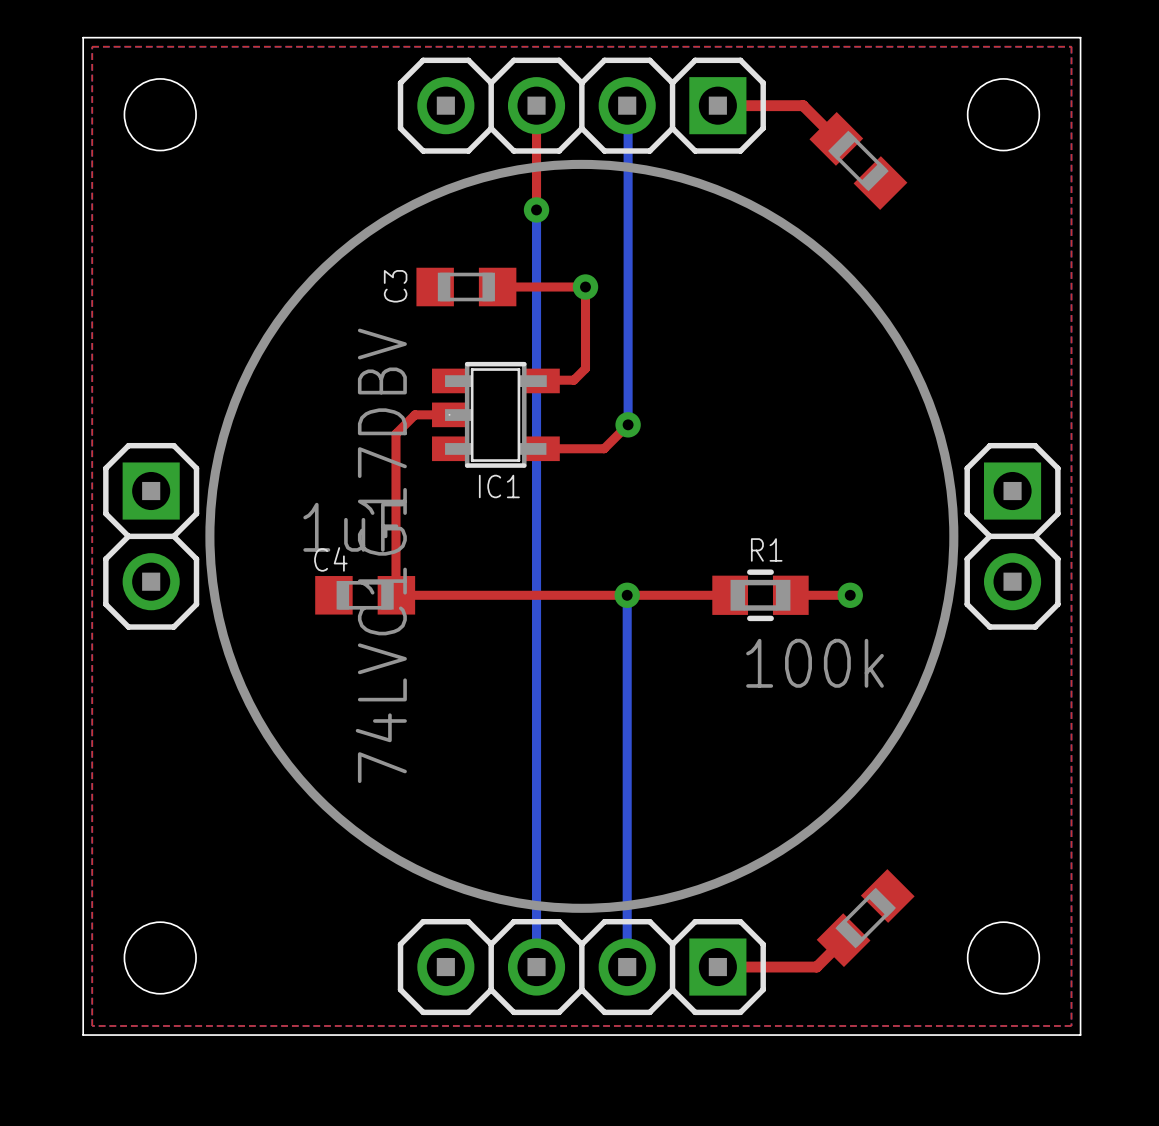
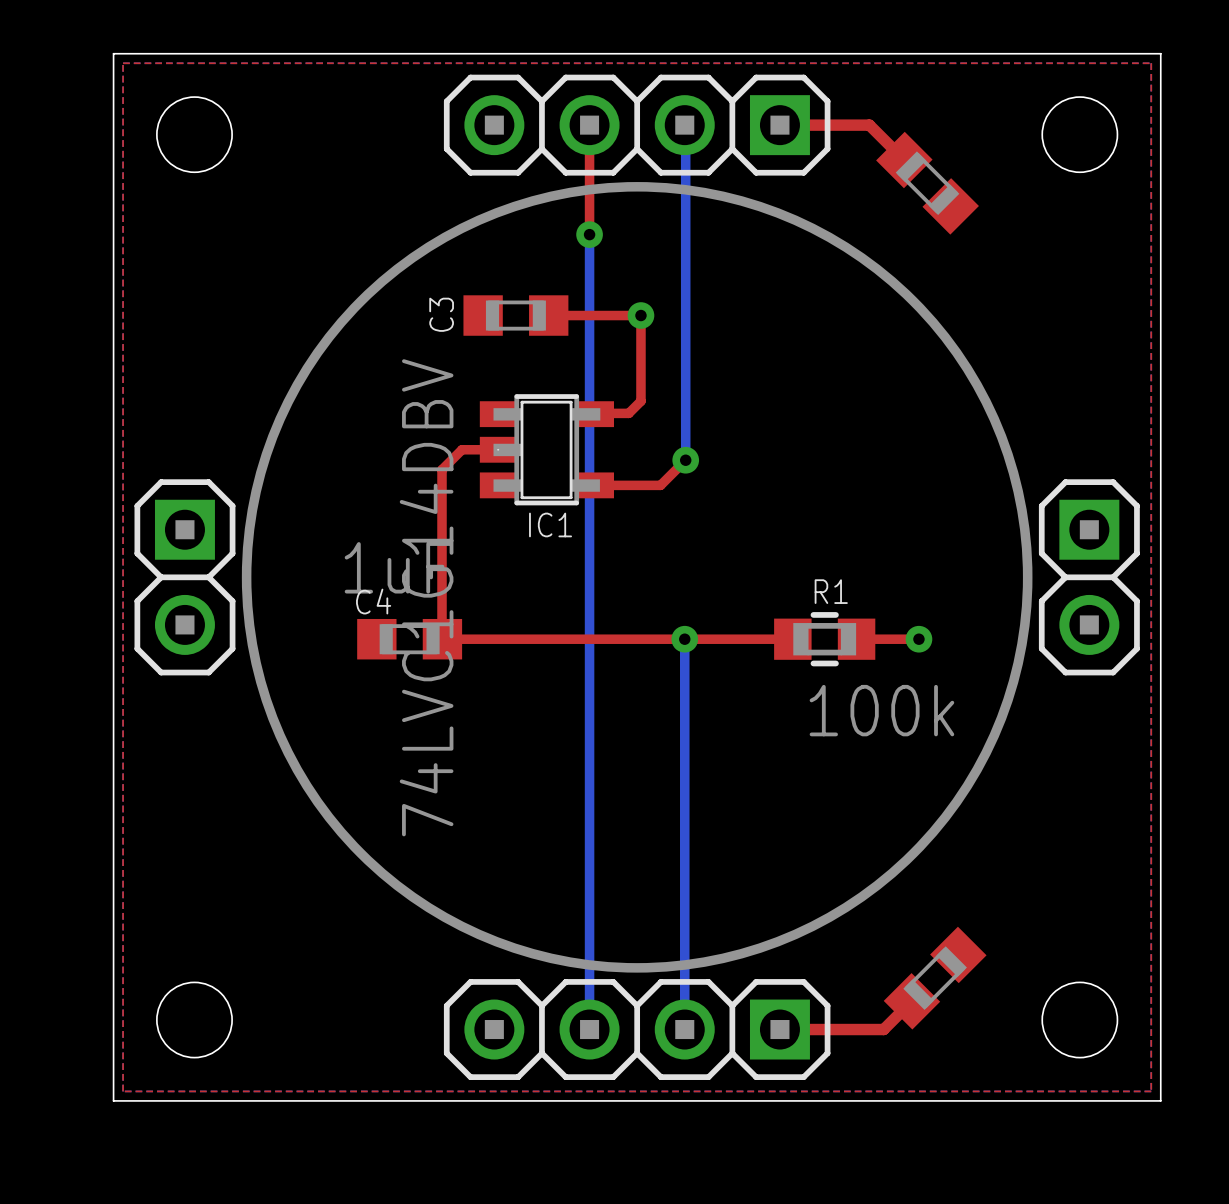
IC1 value: 74LVC1G17DBV (381, 555) -> 74LVC1G14DBV (426, 597)

